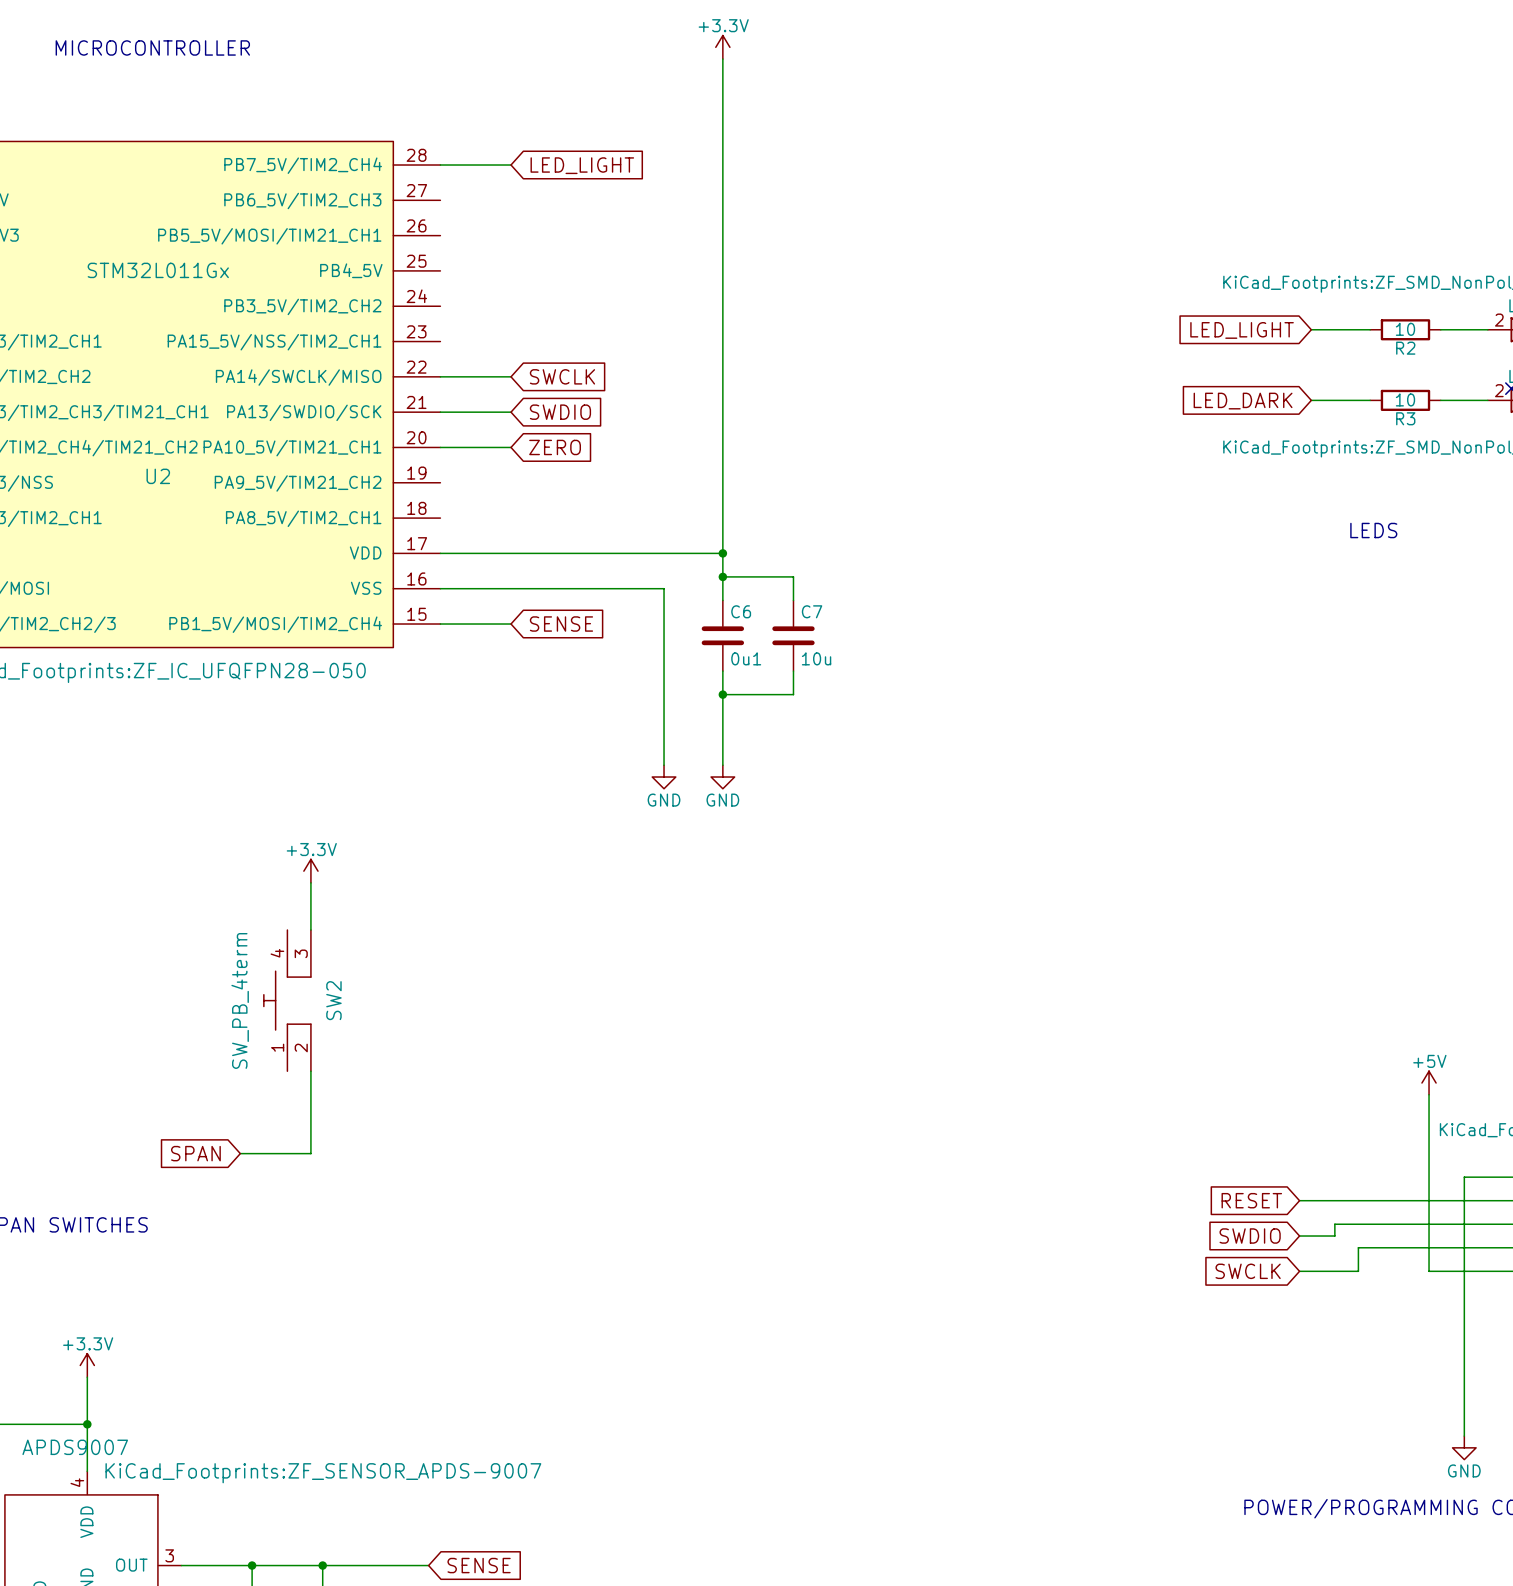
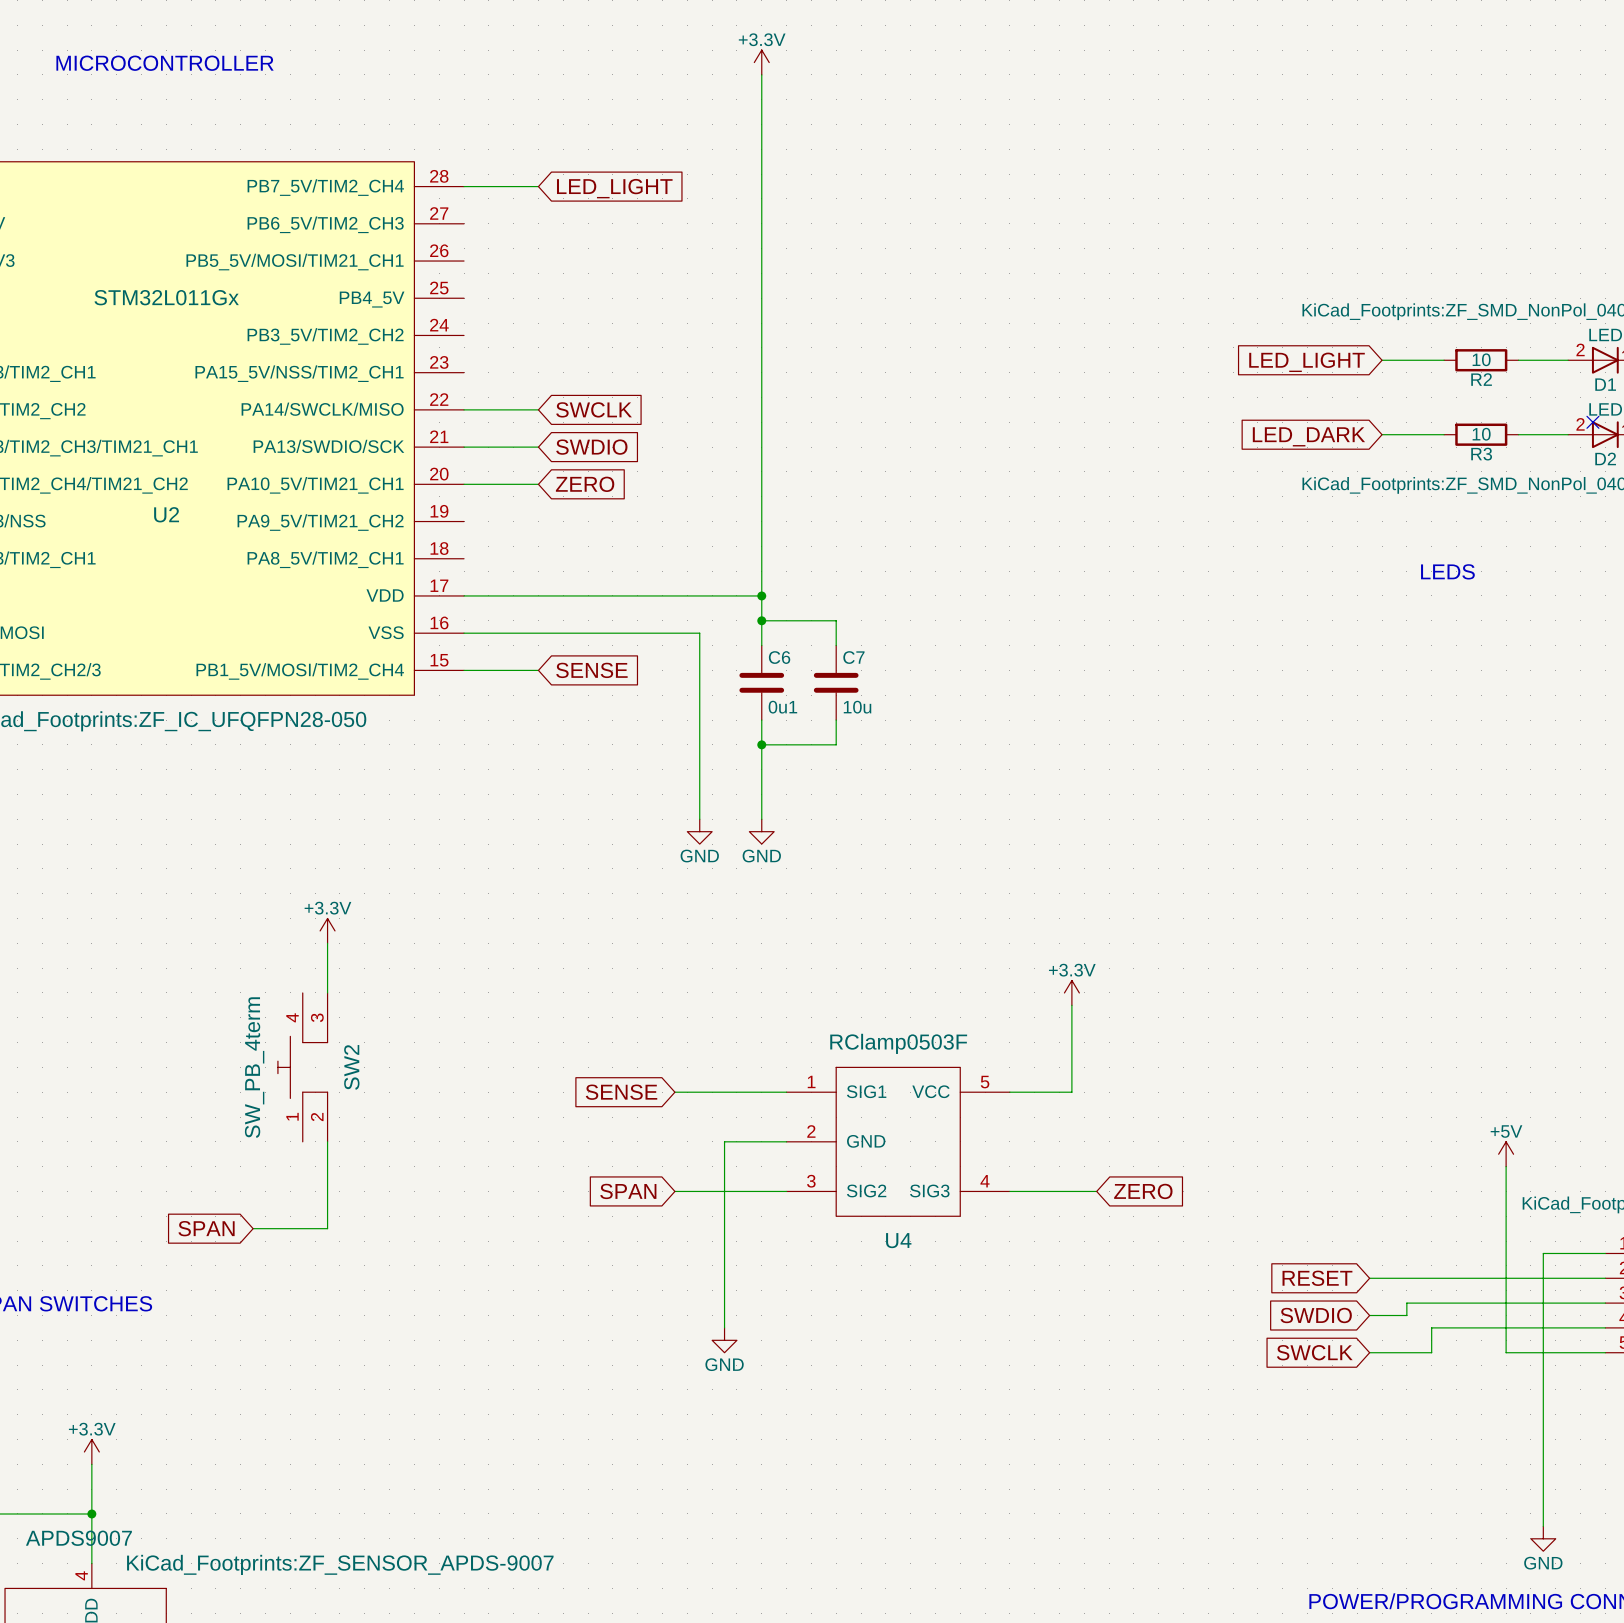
power symbol: none -> +3.3V (1071, 992)
wire: none -> (1071, 1005) (1071, 1092) (1009, 1092)
global label: none -> SENSE (621, 1092)
wire: none -> (674, 1092) (786, 1092)
wire: none -> (786, 1141) (724, 1141) (724, 1327)
U4: none -> RClamp0503F (898, 1141)
global label: none -> SPAN (628, 1191)
wire: none -> (674, 1191) (786, 1191)
wire: none -> (1009, 1191) (1096, 1191)
global label: none -> ZERO (1143, 1191)
power symbol: none -> GND (724, 1340)

